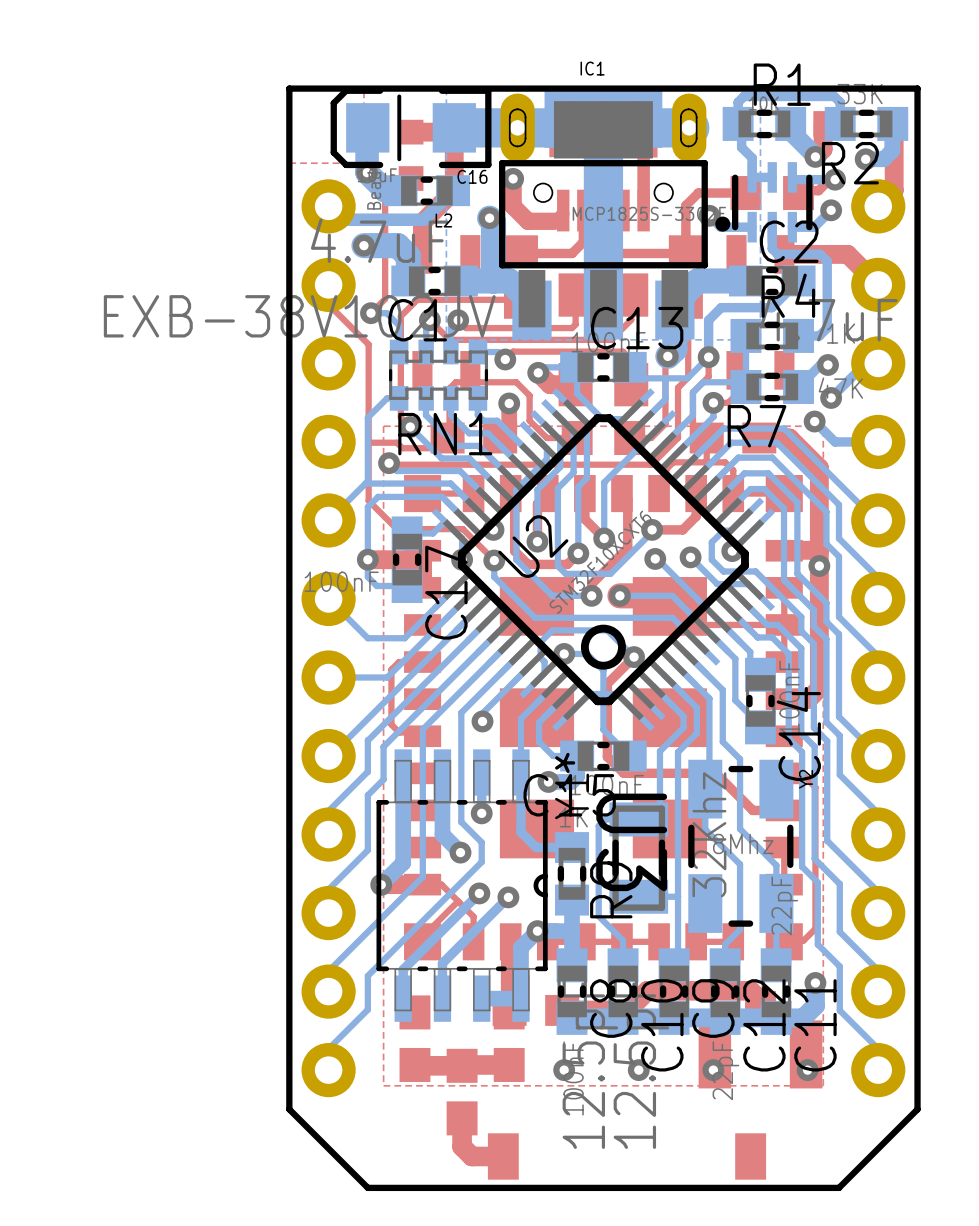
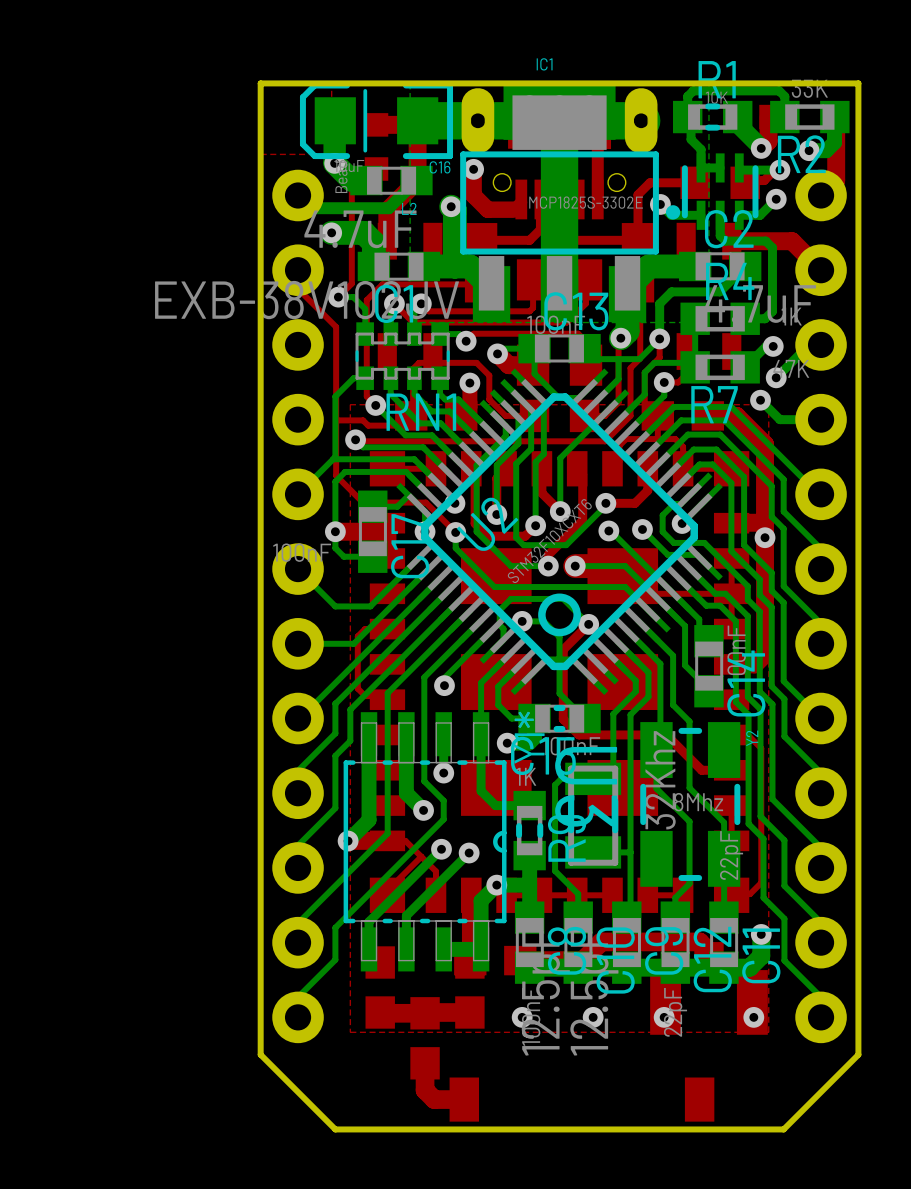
R2 footprint: [824, 106, 909, 141] -> [770, 100, 850, 134]
L2 footprint: [383, 175, 471, 207] -> [350, 165, 433, 196]
C1 footprint: [391, 265, 478, 297] -> [357, 251, 441, 282]
C2 footprint: [728, 265, 816, 297] -> [679, 251, 762, 282]
R4 footprint: [730, 318, 814, 353] -> [680, 302, 760, 335]
C13 footprint: [560, 351, 647, 383] -> [518, 333, 601, 364]
R7 footprint: [730, 369, 814, 404] -> [680, 351, 760, 384]
C17 footprint: [391, 516, 423, 604] -> [358, 490, 388, 573]
C14 footprint: [745, 657, 776, 745] -> [694, 625, 724, 708]
C8 footprint: [556, 948, 588, 1035] -> [514, 901, 545, 984]
C10 footprint: [607, 948, 639, 1035] -> [563, 901, 593, 984]
C9 footprint: [658, 948, 690, 1035] -> [612, 901, 642, 984]
C12 footprint: [709, 948, 741, 1035] -> [660, 901, 691, 984]
C11 footprint: [760, 948, 792, 1035] -> [709, 901, 739, 984]

